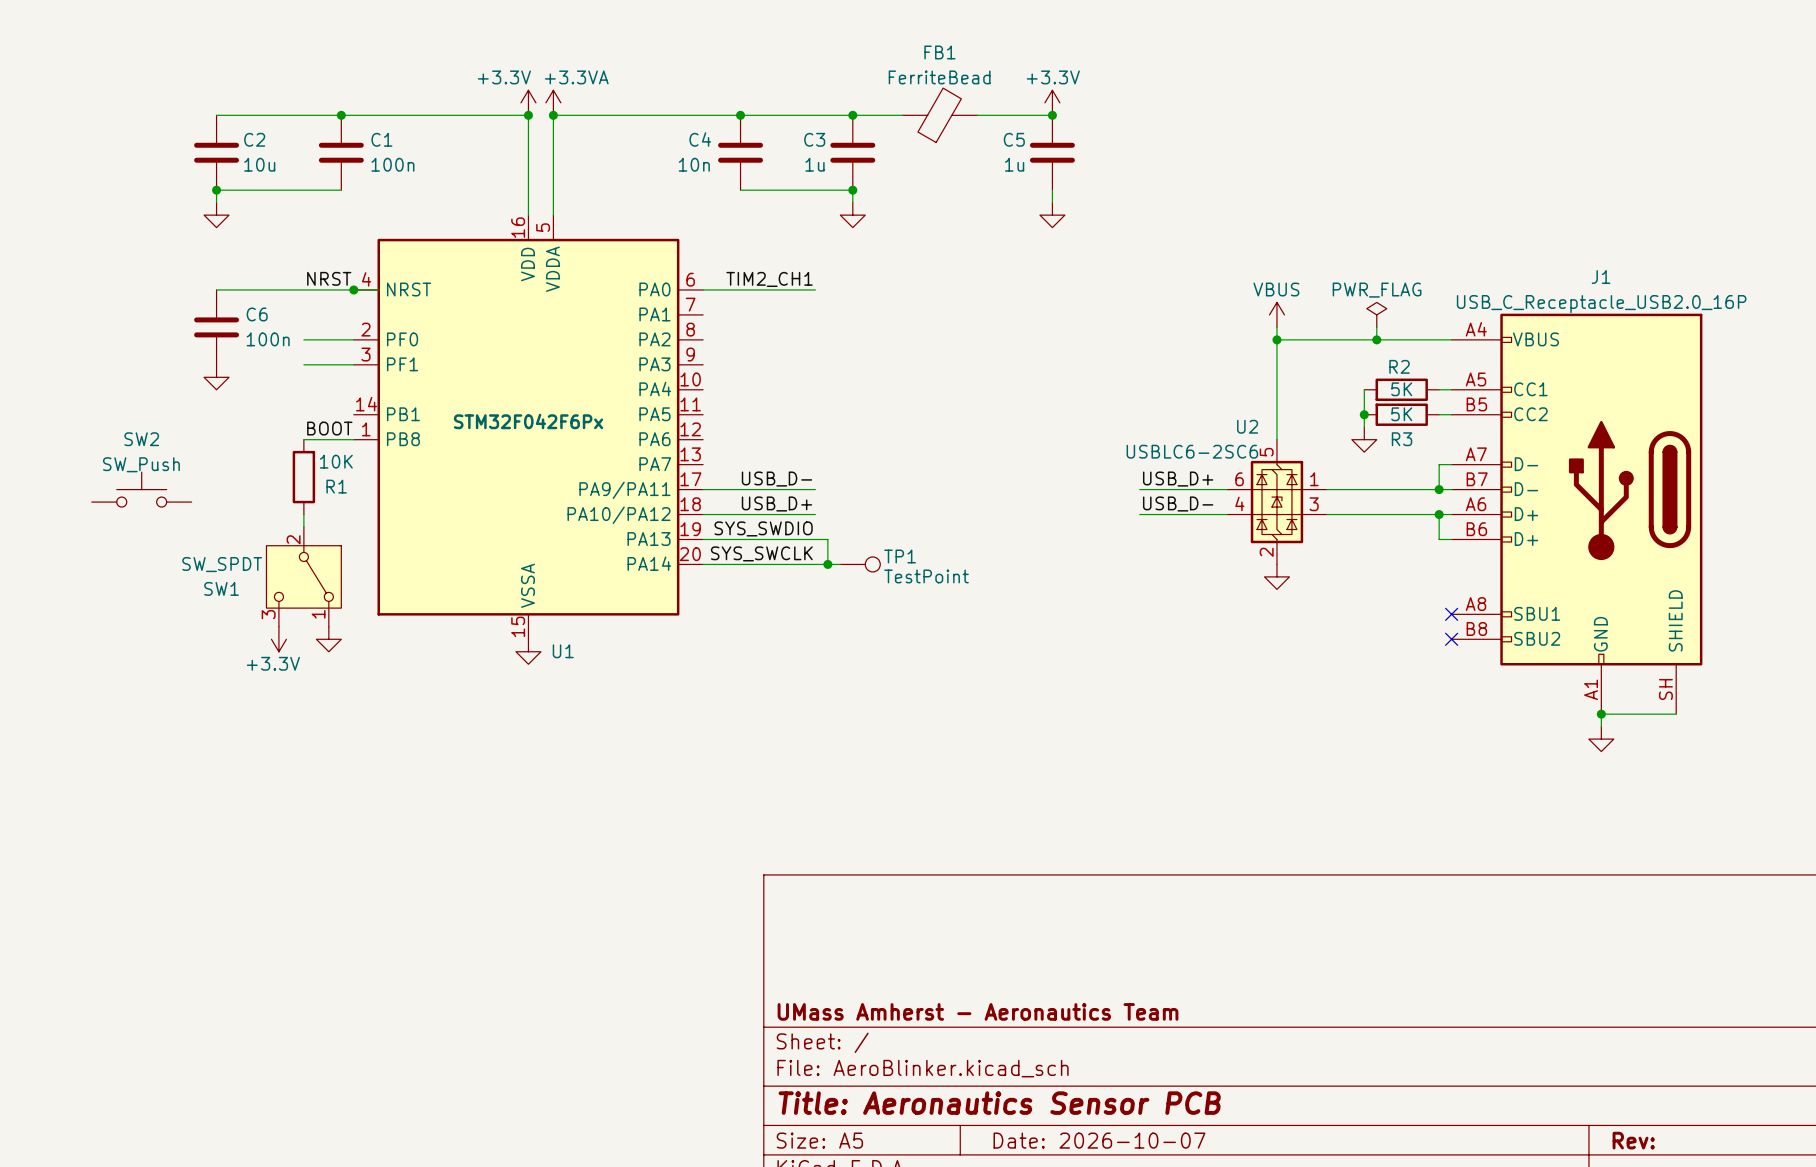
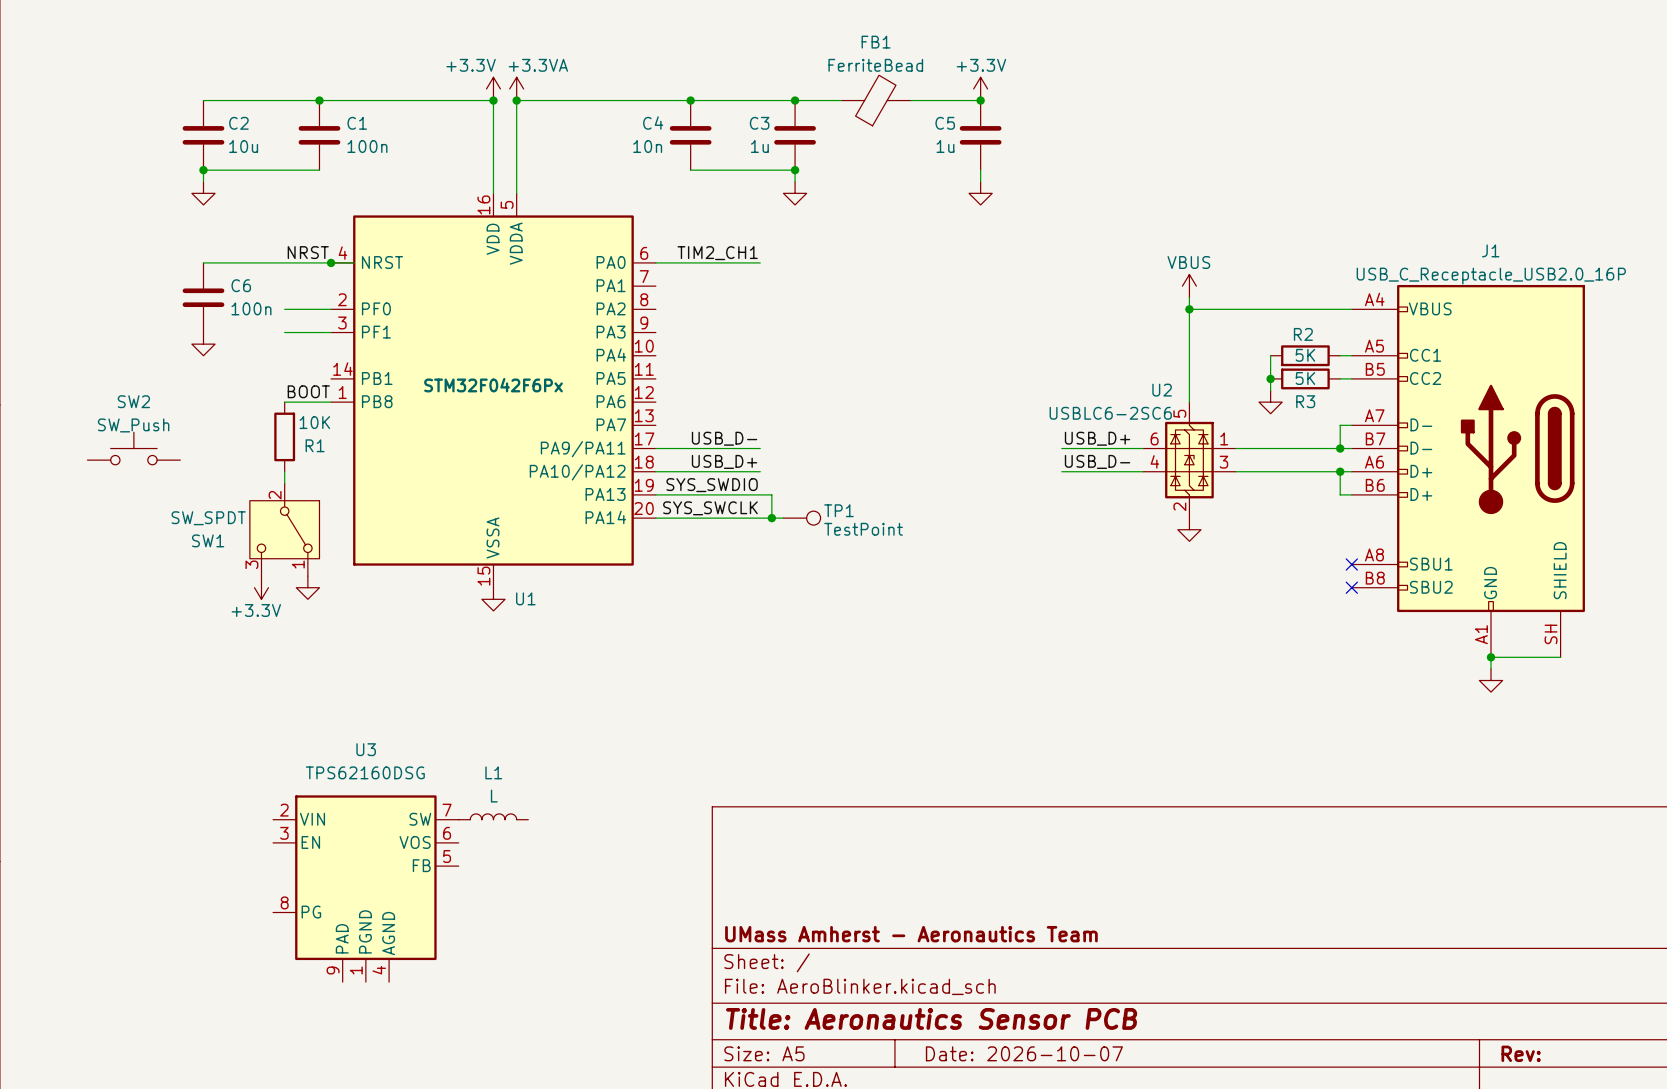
power symbol: PWR_FLAG (1376, 314) -> none
wire: (1376, 327) (1376, 339) -> none
junction: (1376, 339) -> none
L1: none -> L (493, 816)
U3: none -> TPS62160DSG (365, 888)

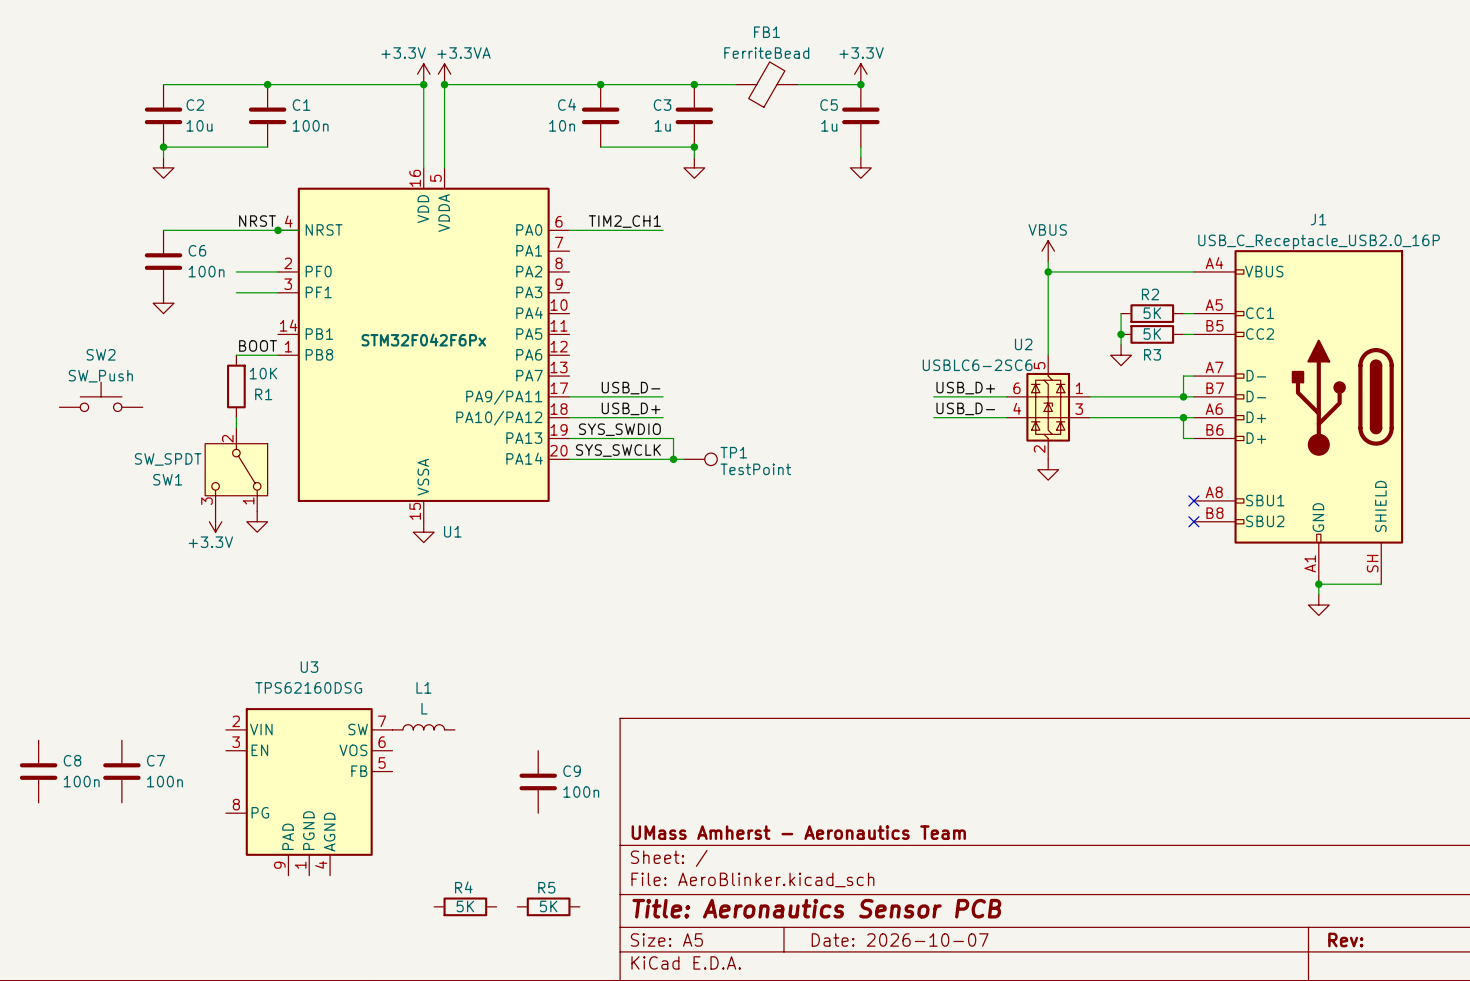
C8: none -> 100n (38, 771)
C7: none -> 100n (121, 771)
C9: none -> 100n (538, 781)
R4: none -> 5K (465, 906)
R5: none -> 5K (548, 906)

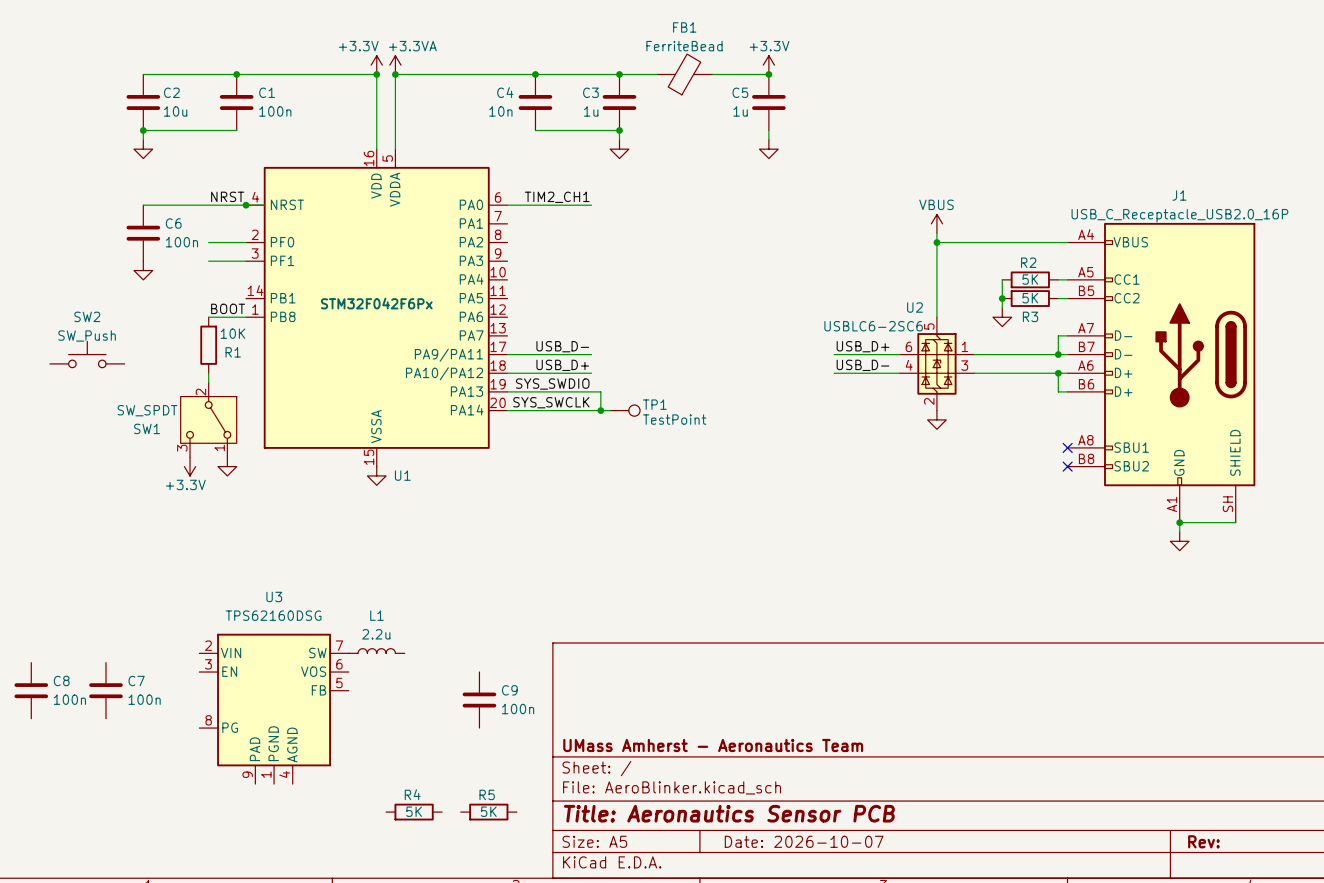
L1 value: L (424, 708) -> 2.2u (376, 634)

